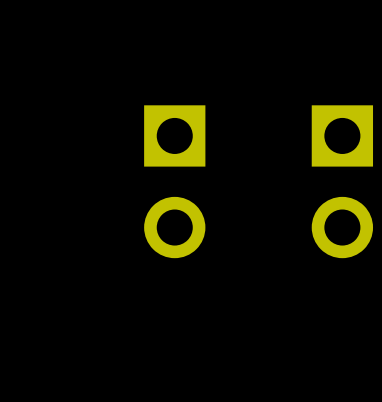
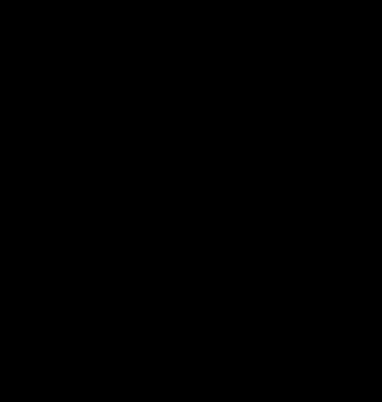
part: (174, 181) -> none
part: (342, 181) -> none

